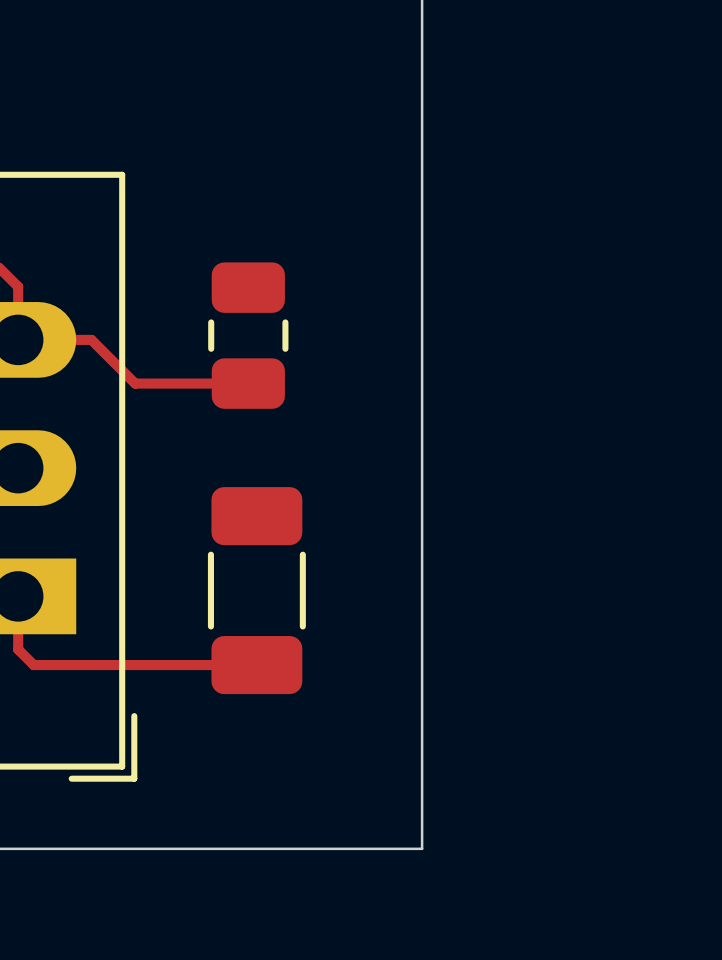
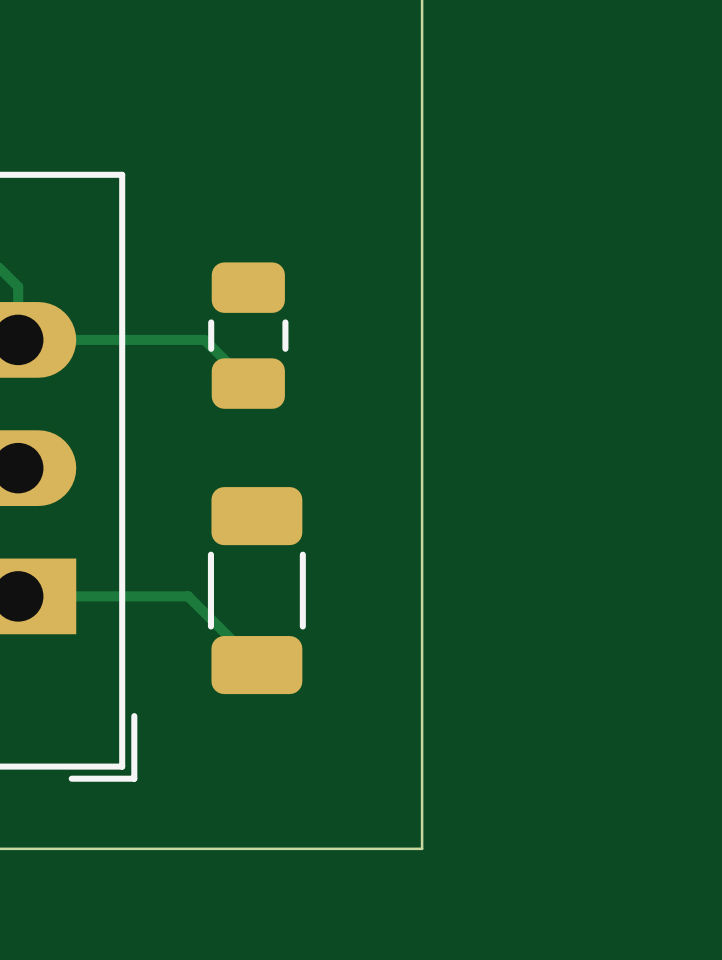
track: (91, 339) (135, 383) (248, 383) -> (91, 339) (204, 339) (248, 383)
track: (18, 596) (18, 649) (33, 665) (256, 665) -> (18, 596) (188, 596) (256, 665)

